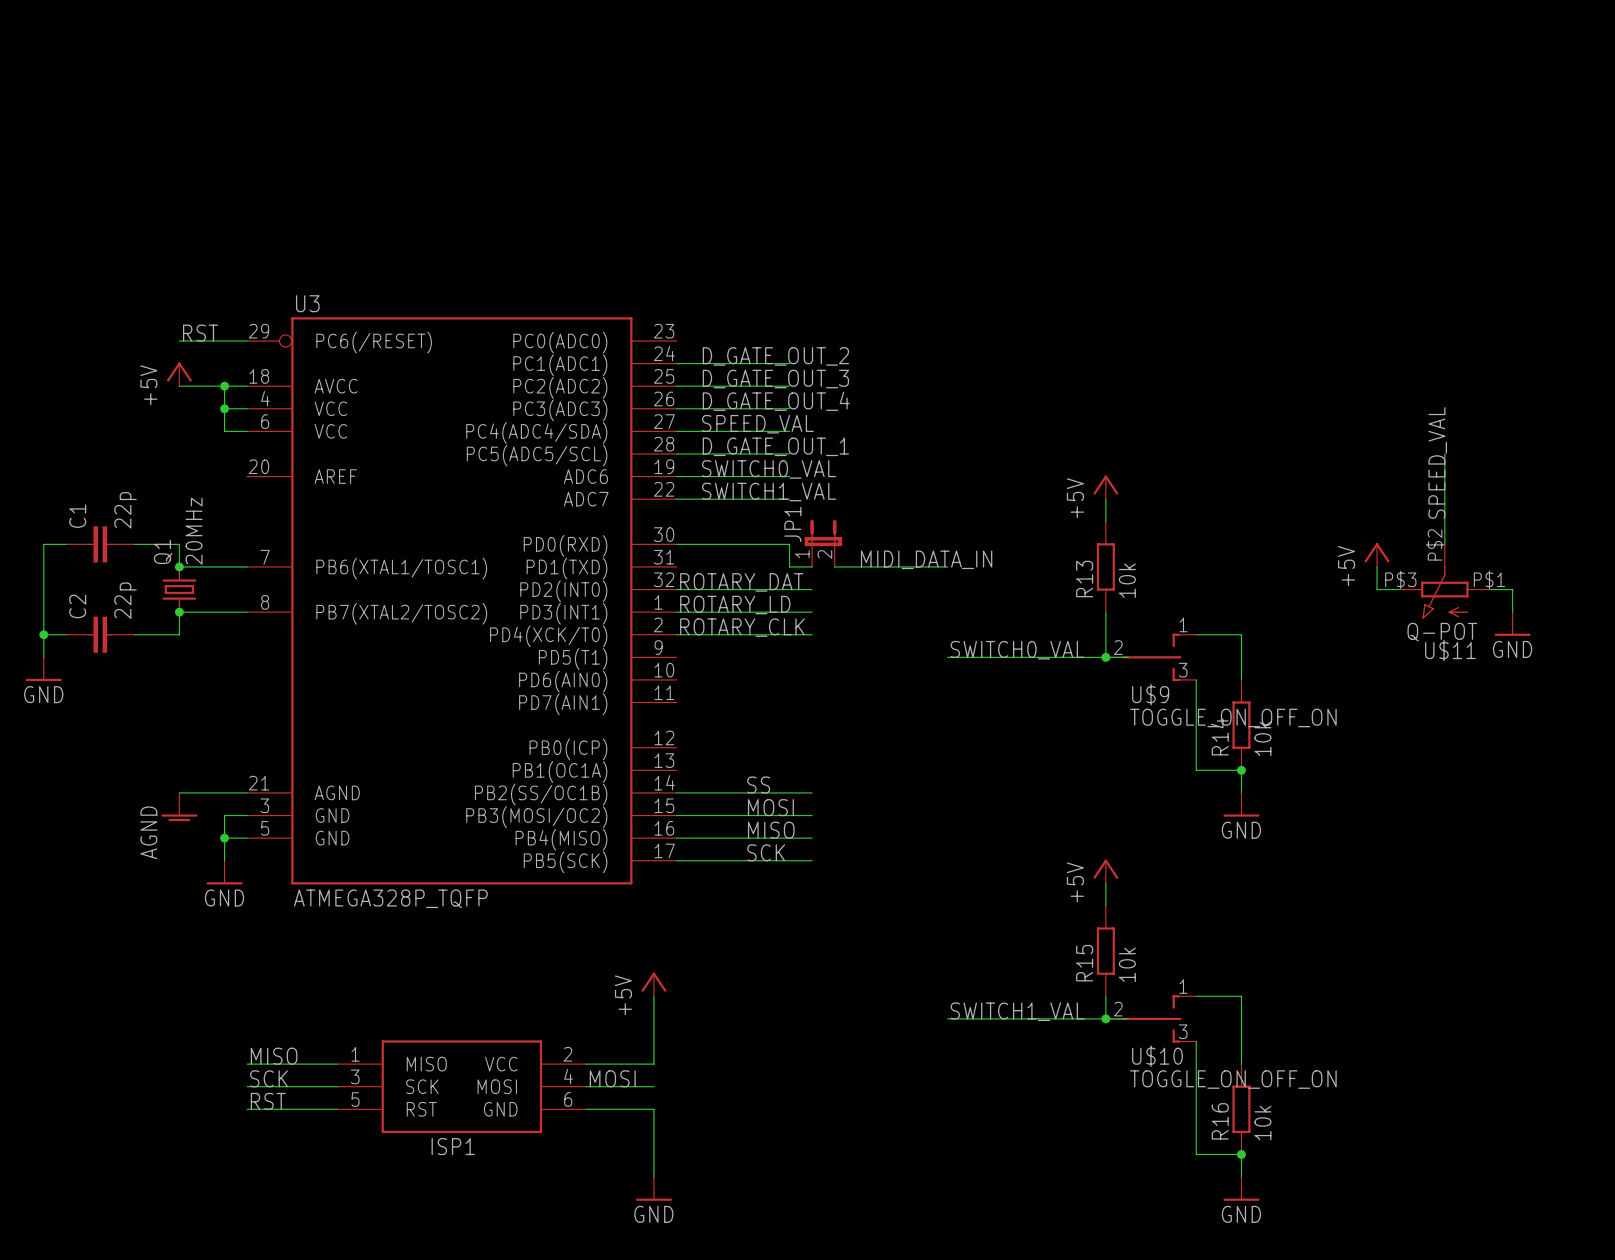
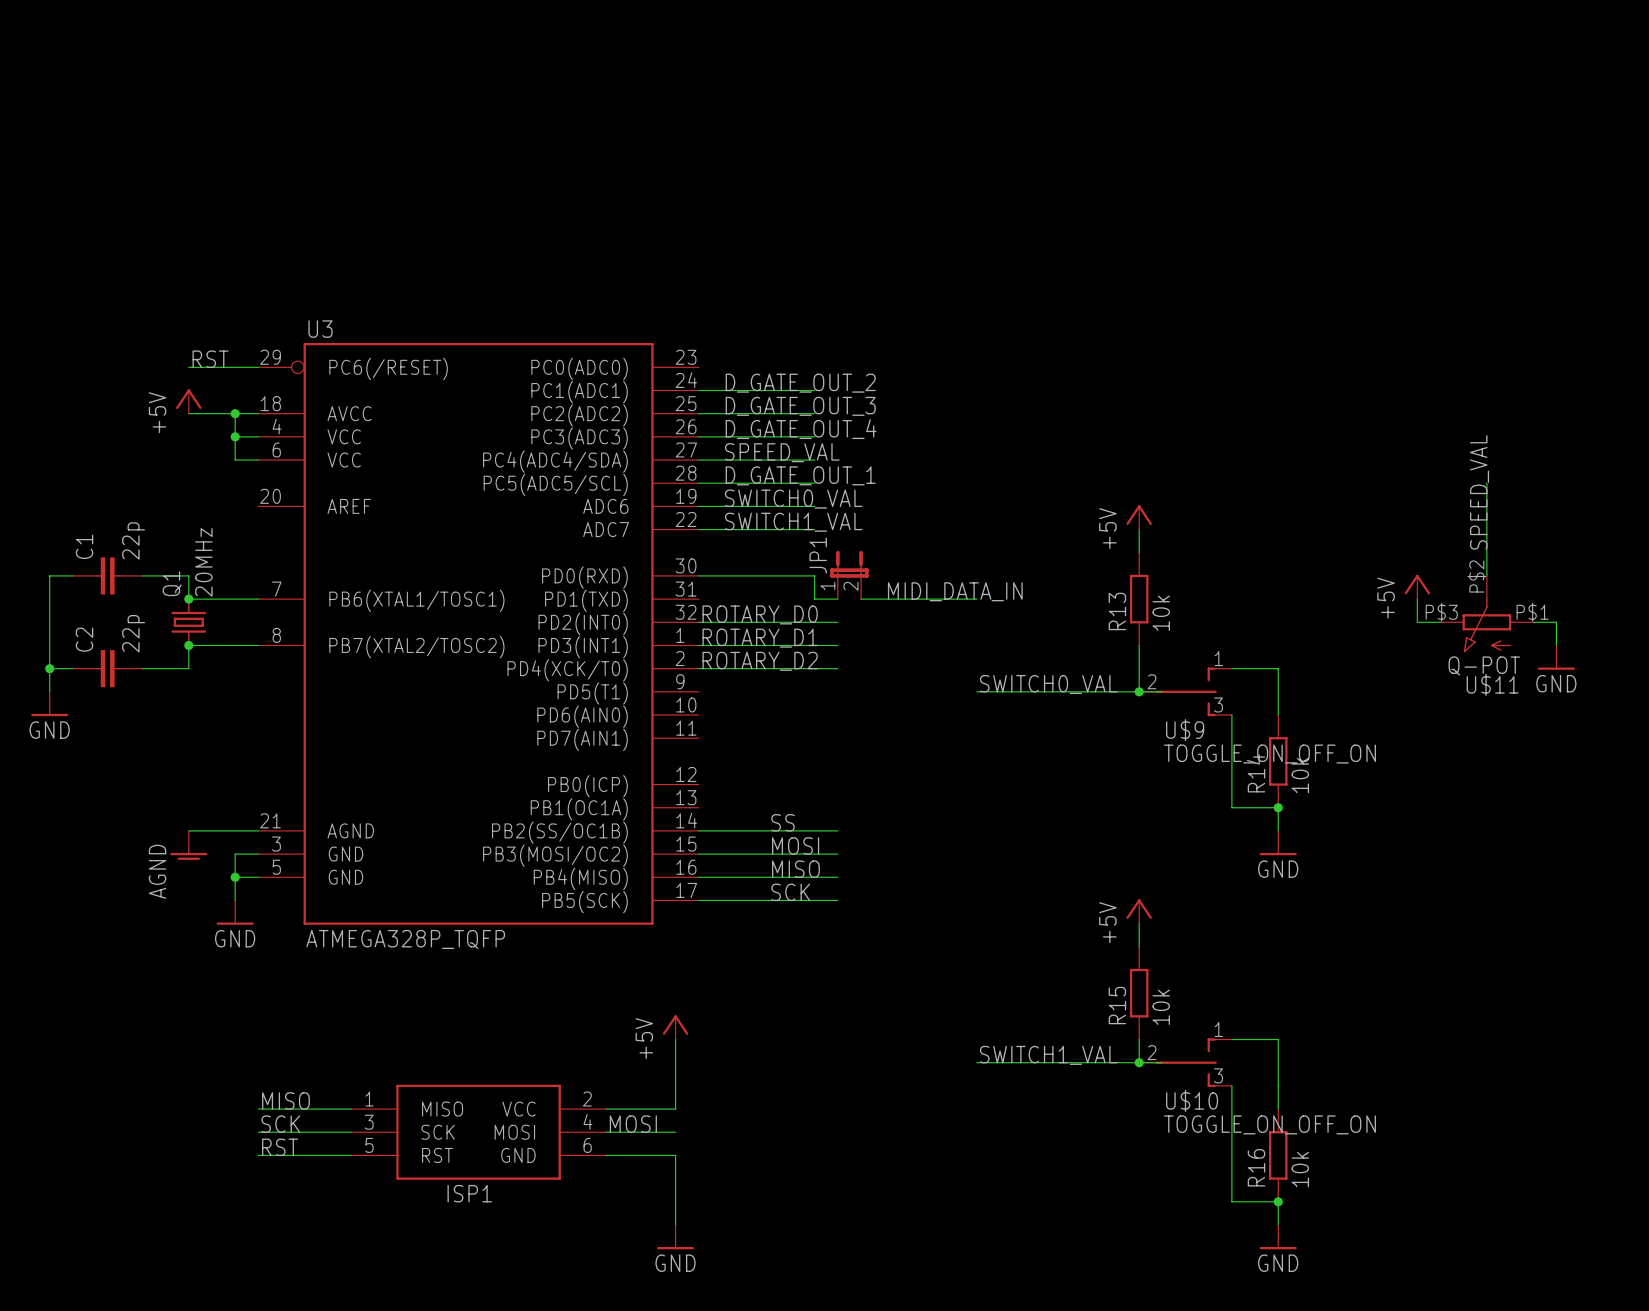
label: ROTARY_DAT (741, 582) -> ROTARY_D0 (760, 614)
label: ROTARY_LD (735, 605) -> ROTARY_D1 (760, 638)
label: ROTARY_CLK (742, 627) -> ROTARY_D2 (760, 661)

